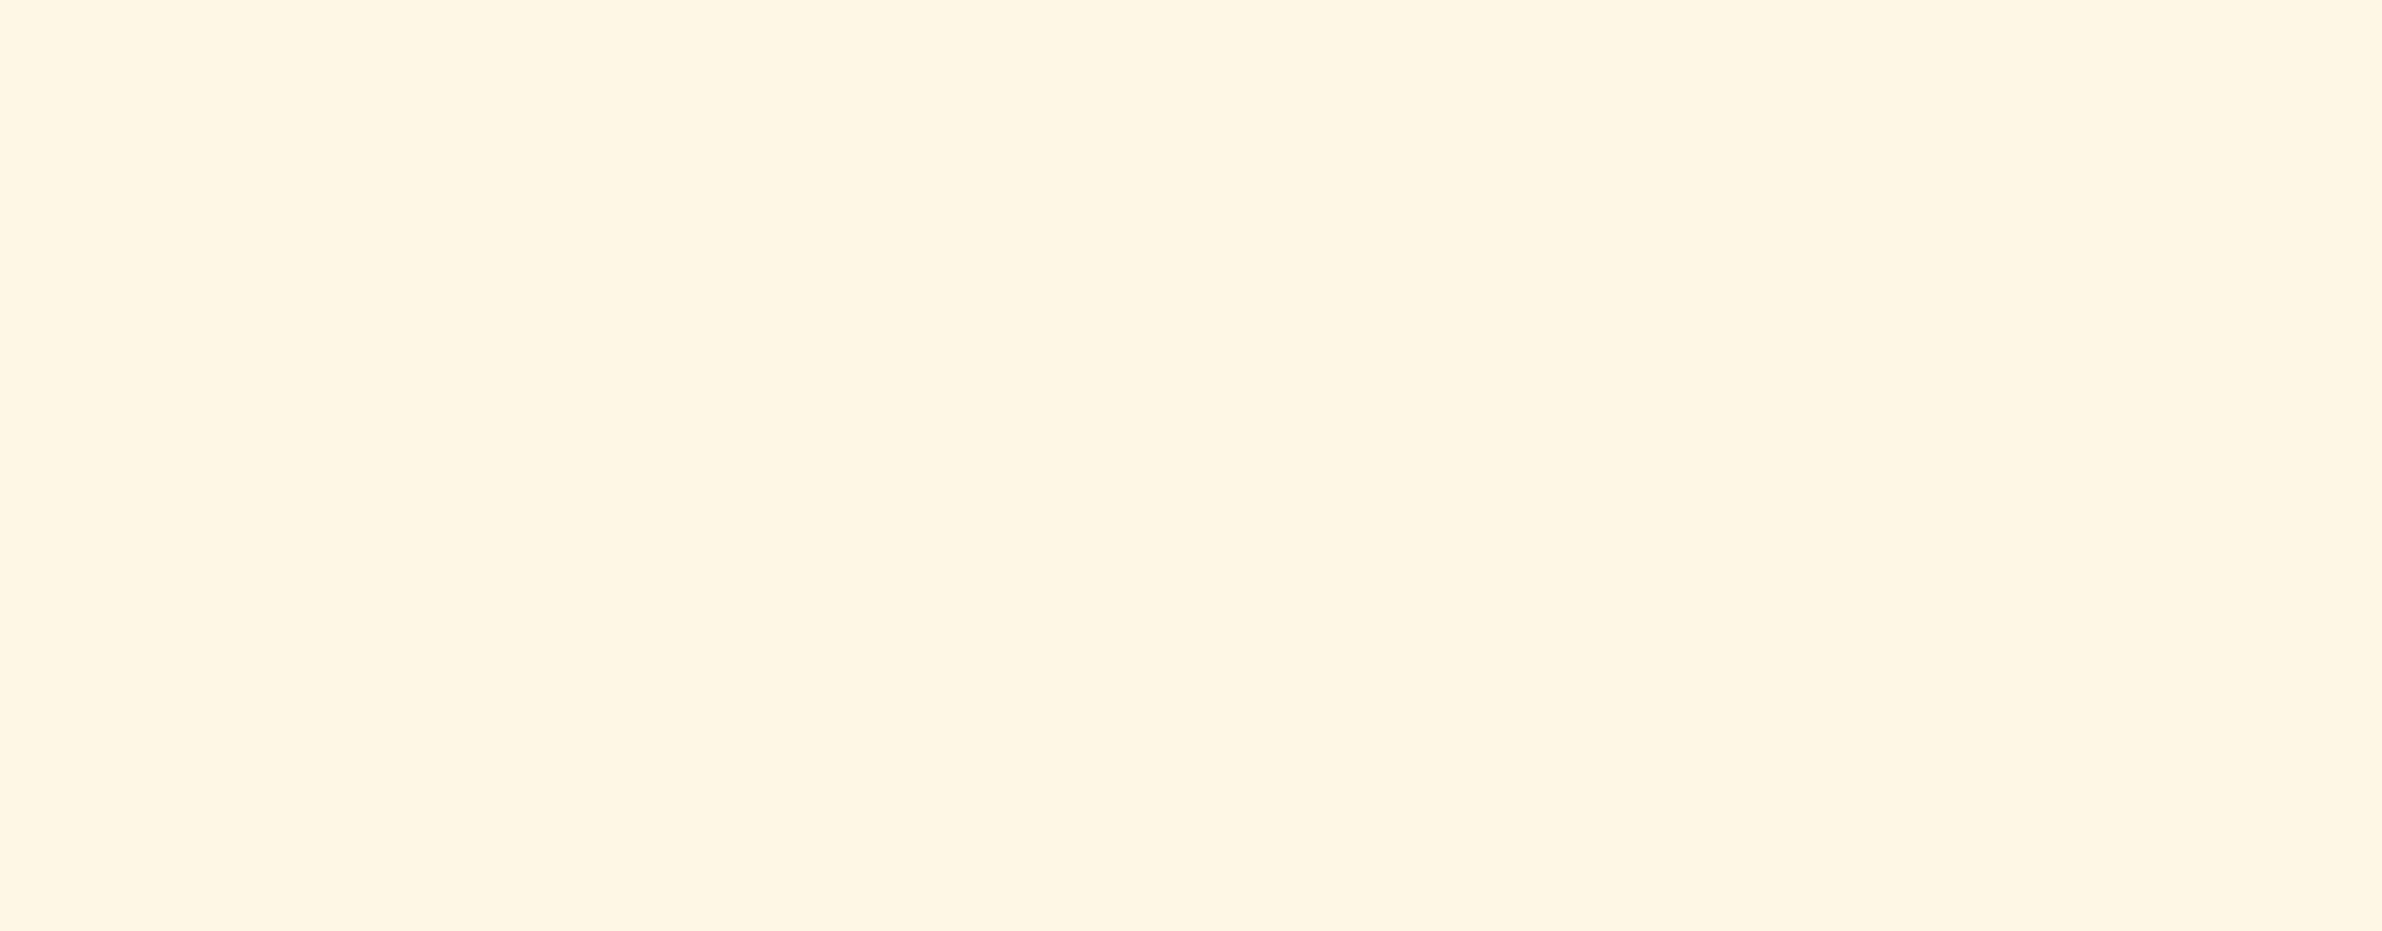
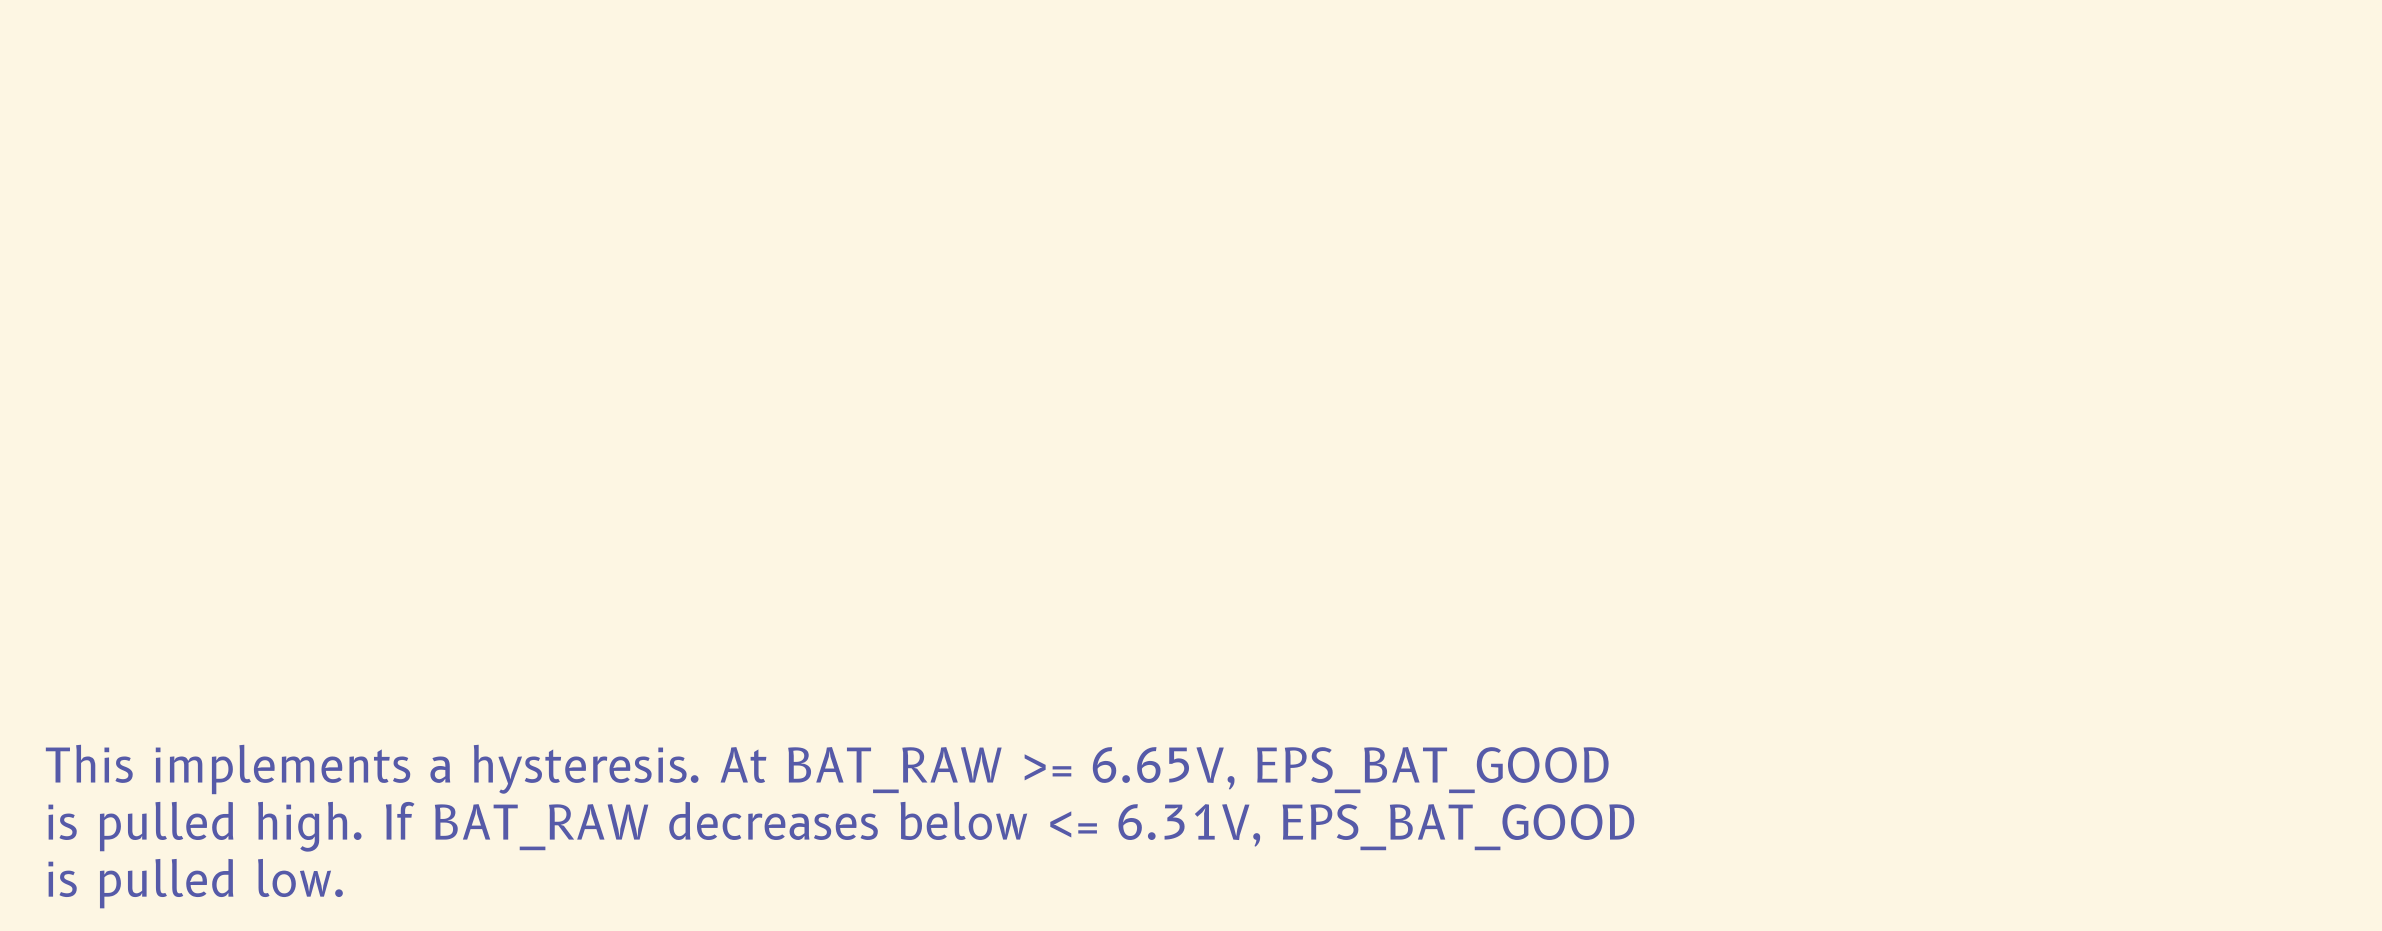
text: none -> This implements a hysteresis. At BAT_RAW >= 6.65V, EPS_BAT_GOOD (827, 769)
text: none -> is pulled high. If BAT_RAW decreases below <= 6.31V, EPS_BAT_GOOD (841, 826)
text: none -> is pulled low. (195, 883)

